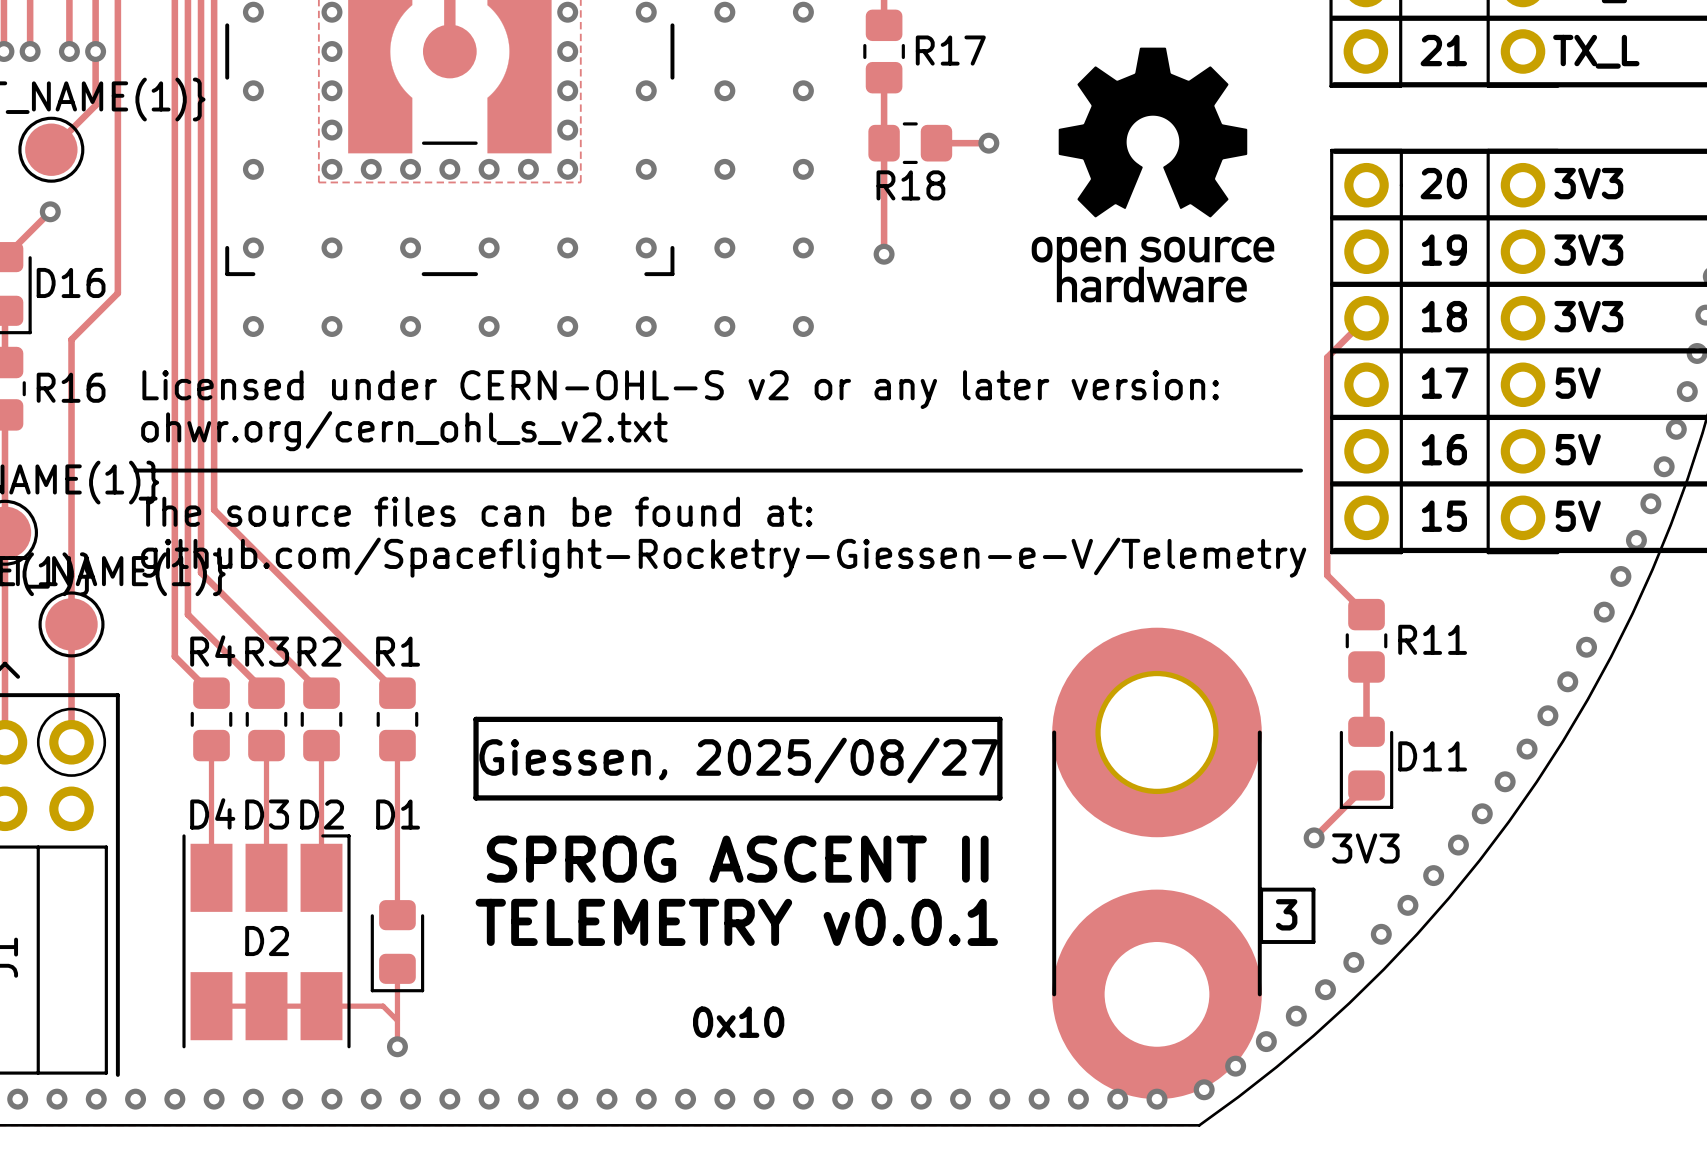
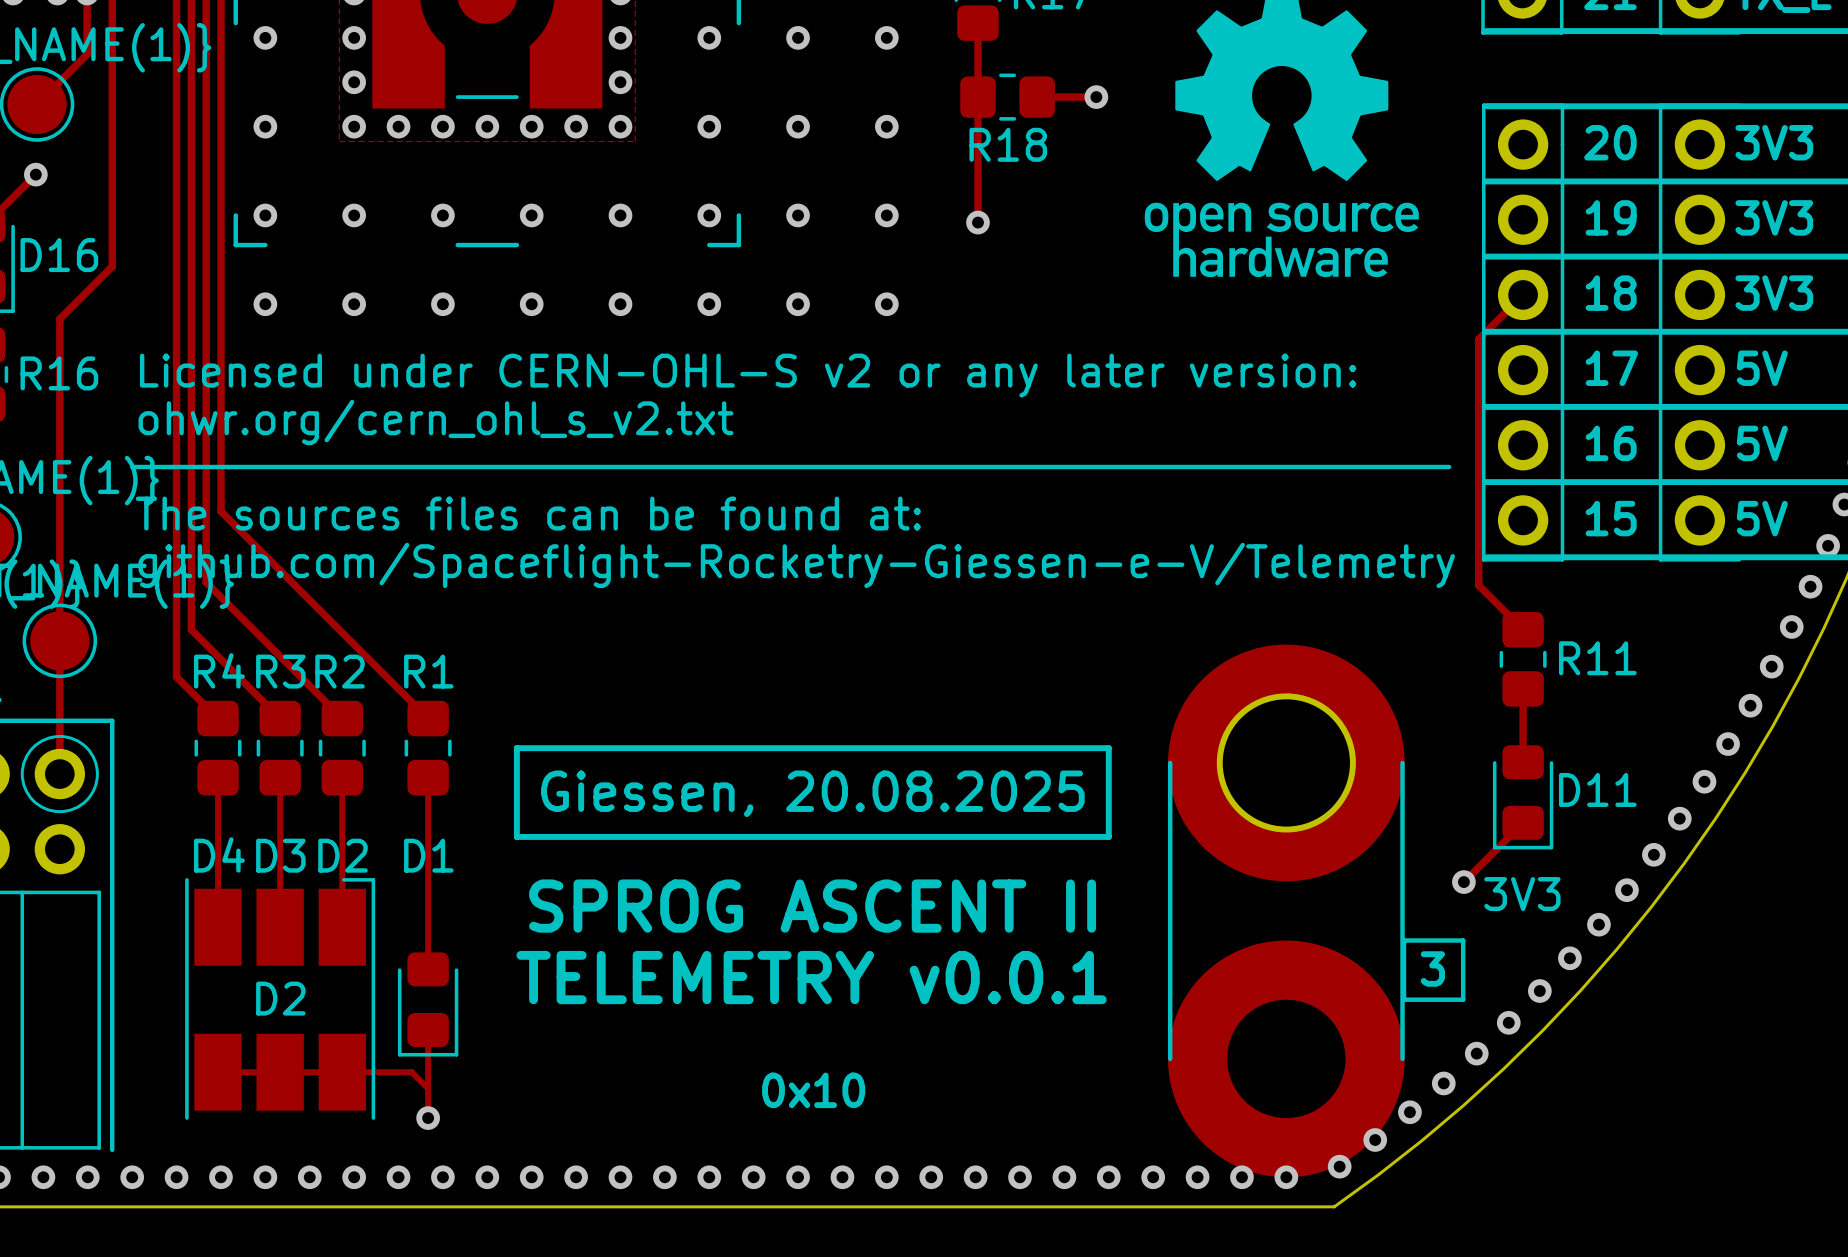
text: The source files can be found at: (475, 511) -> The sources files can be found at: (528, 513)
text: Giessen, 2025/08/27 (738, 760) -> Giessen, 20.08.2025 (812, 793)

